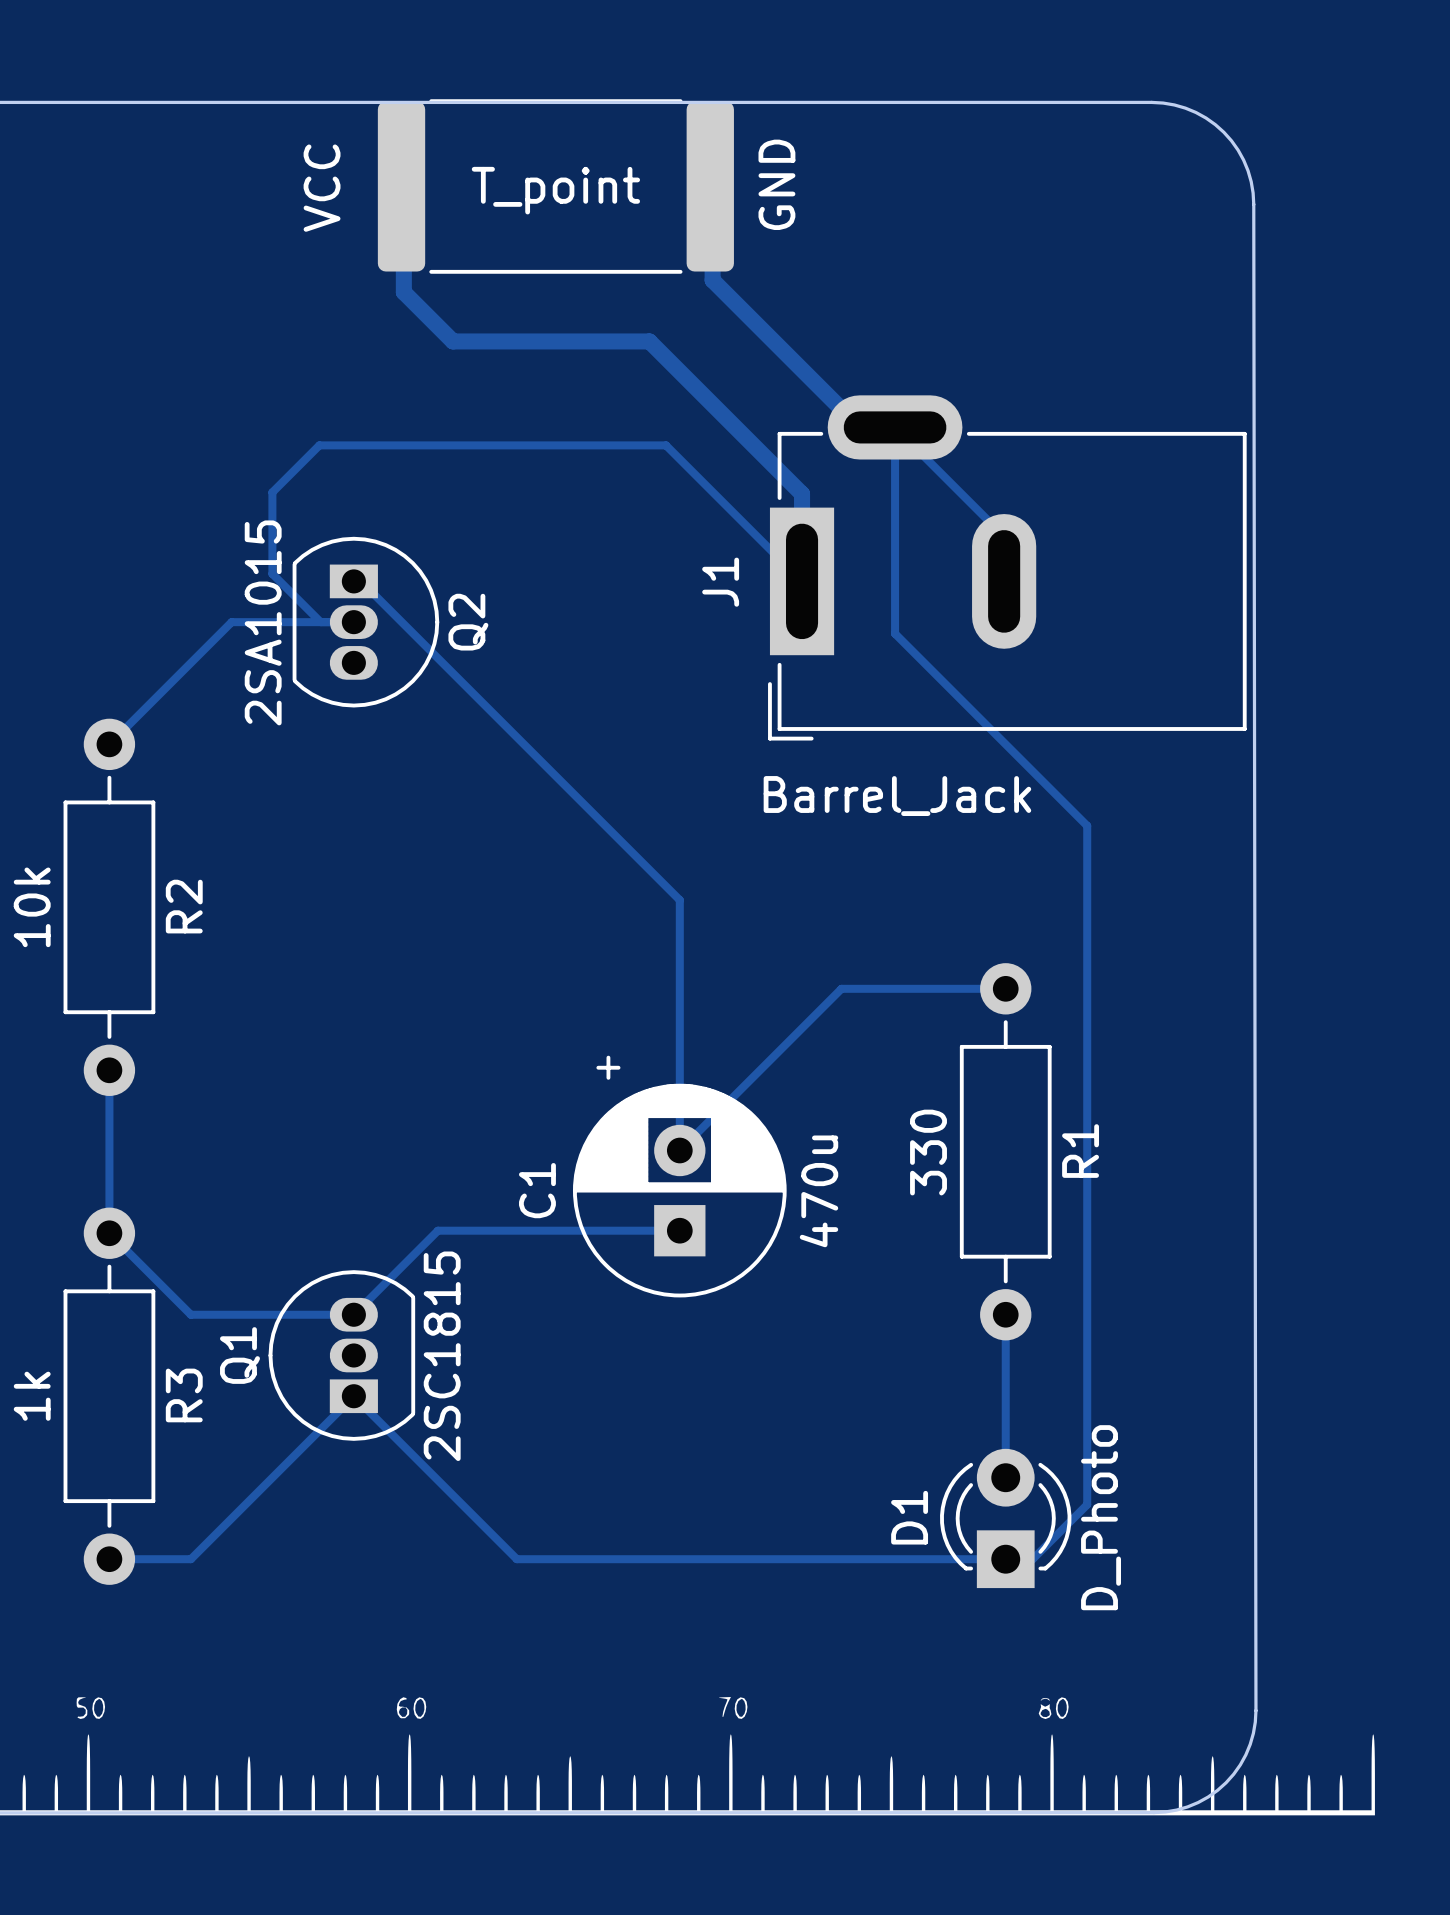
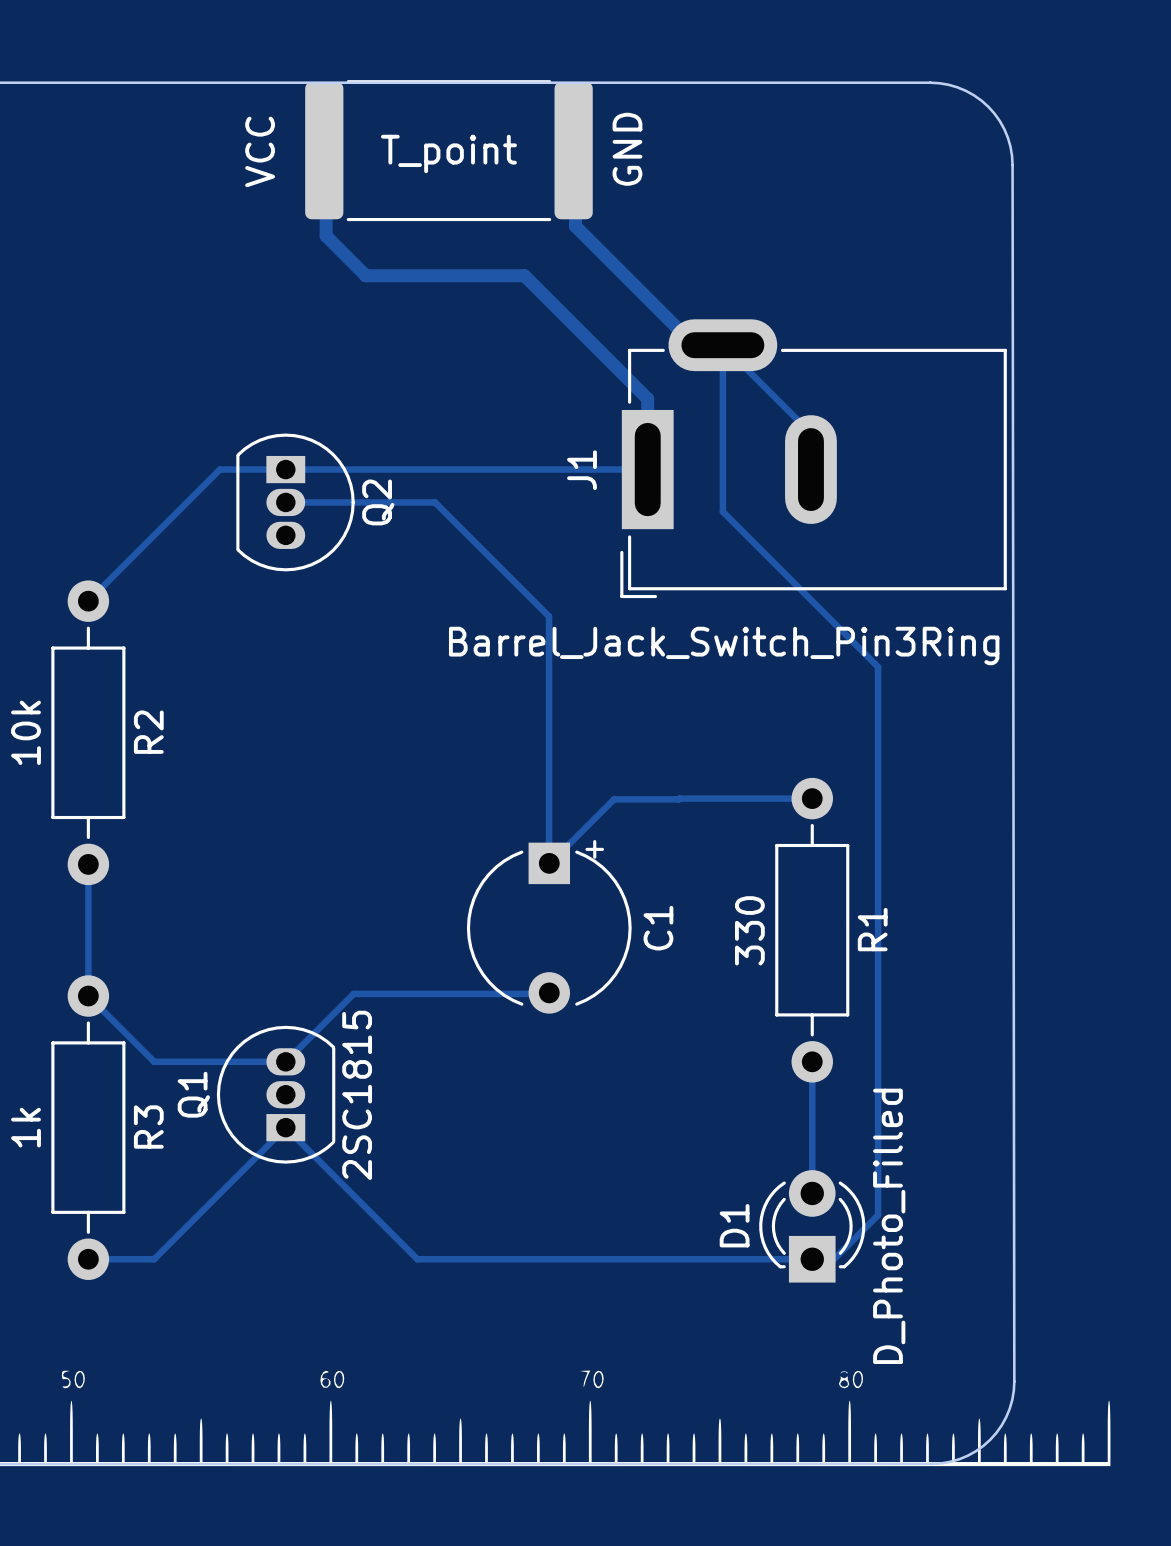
track: (361, 581) (679, 900) -> (285, 502) (435, 502) (549, 616) (549, 726)
track: none -> (291, 469) (632, 469)
track: (802, 581) (666, 445) (319, 445) (272, 492) (272, 573) (320, 622) -> none
track: (231, 622) (353, 622) -> (187, 502) (219, 469) (285, 469)
Q2 value: 2SA1015 (263, 622) -> none
J1 value: Barrel_Jack (897, 796) -> Barrel_Jack_Switch_Pin3Ring (724, 645)
track: (840, 989) (679, 1150) (679, 1070) -> (678, 799) (614, 799) (549, 864)
C1 footprint: [572, 1055, 787, 1298] -> [466, 840, 632, 1014]
C1 name position: C1 (537, 1190) -> C1 (658, 928)
C1 value: 470u (819, 1191) -> none
D1 value: D_Photo (1101, 1517) -> D_Photo_Filled (889, 1226)

